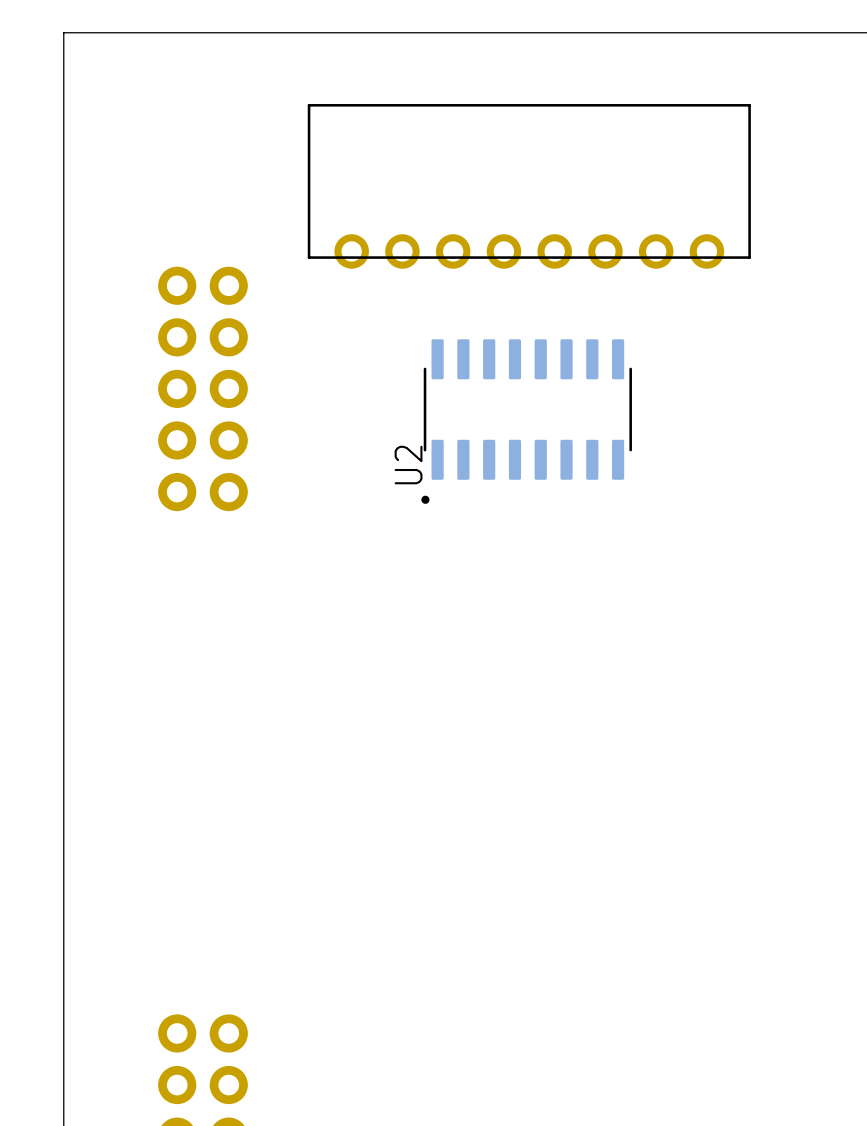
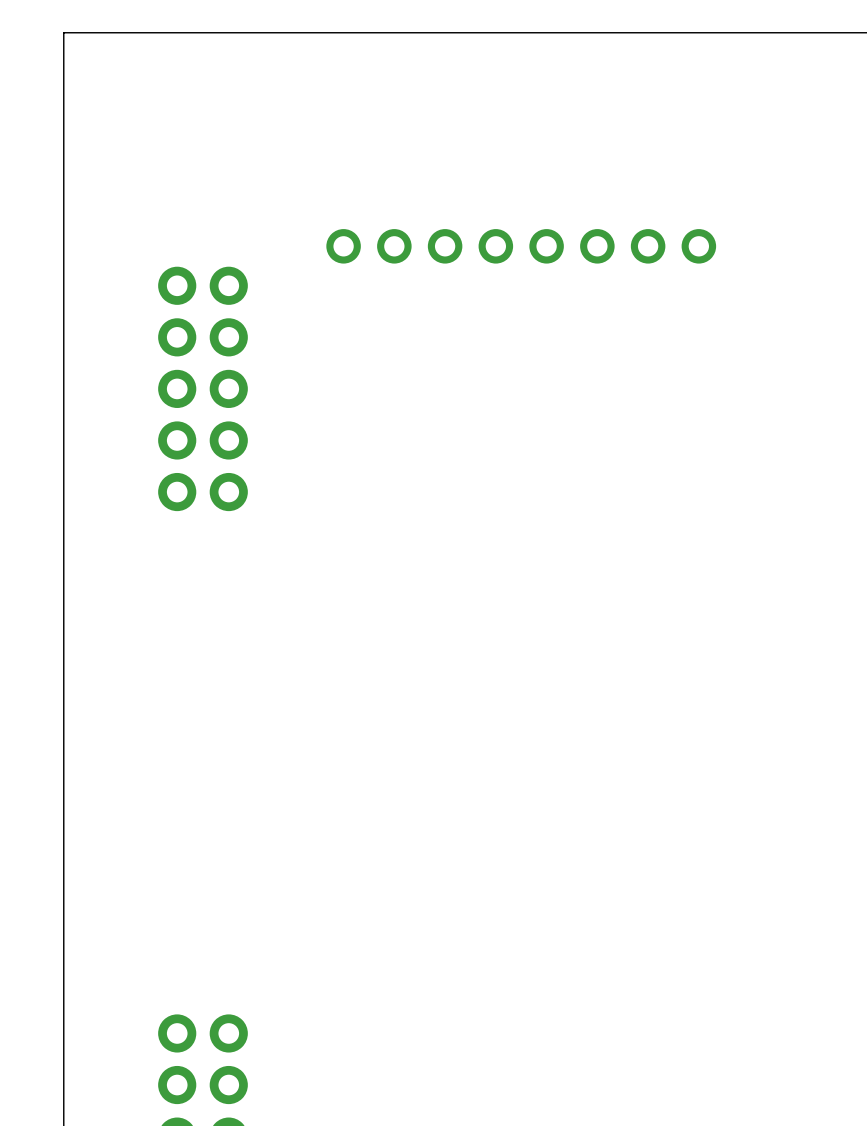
part side: bottom (529, 186) -> top (521, 246)
U2: (526, 421) -> none

